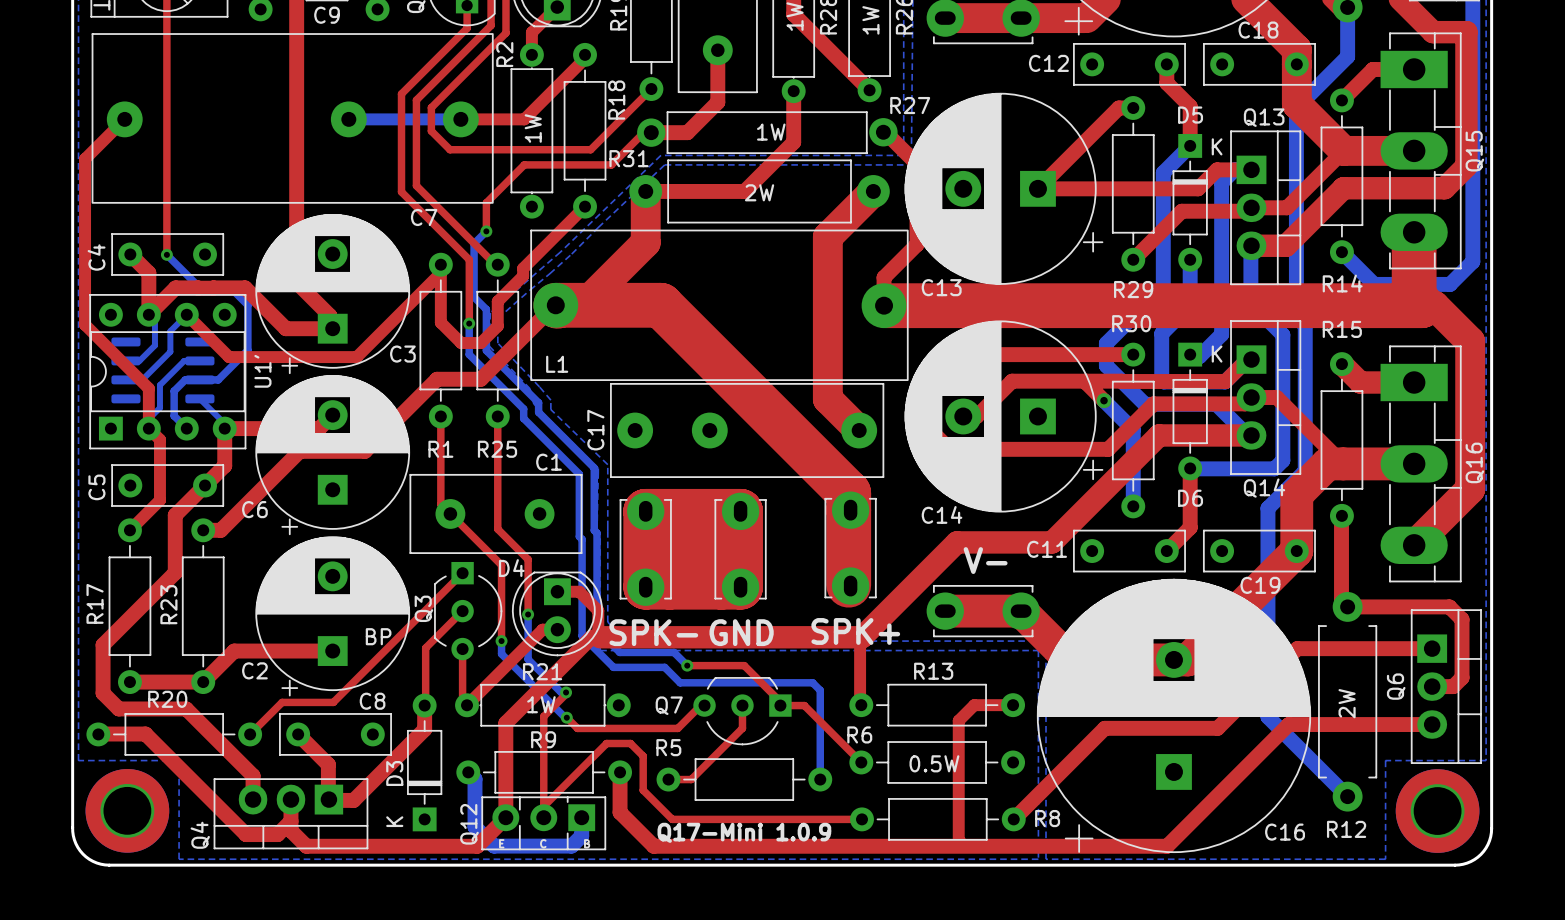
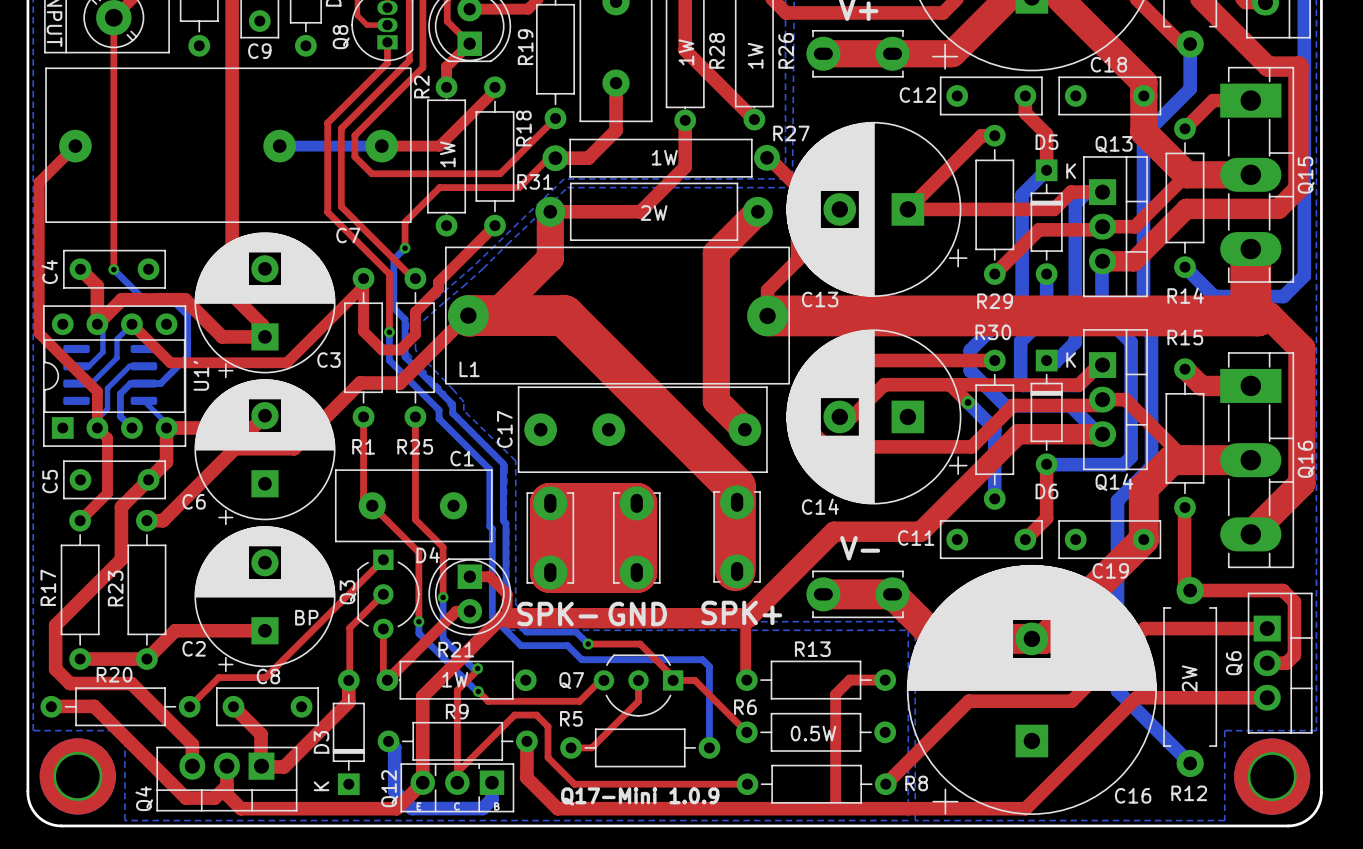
C8 name position: C8 (372, 701) -> C8 (268, 676)

